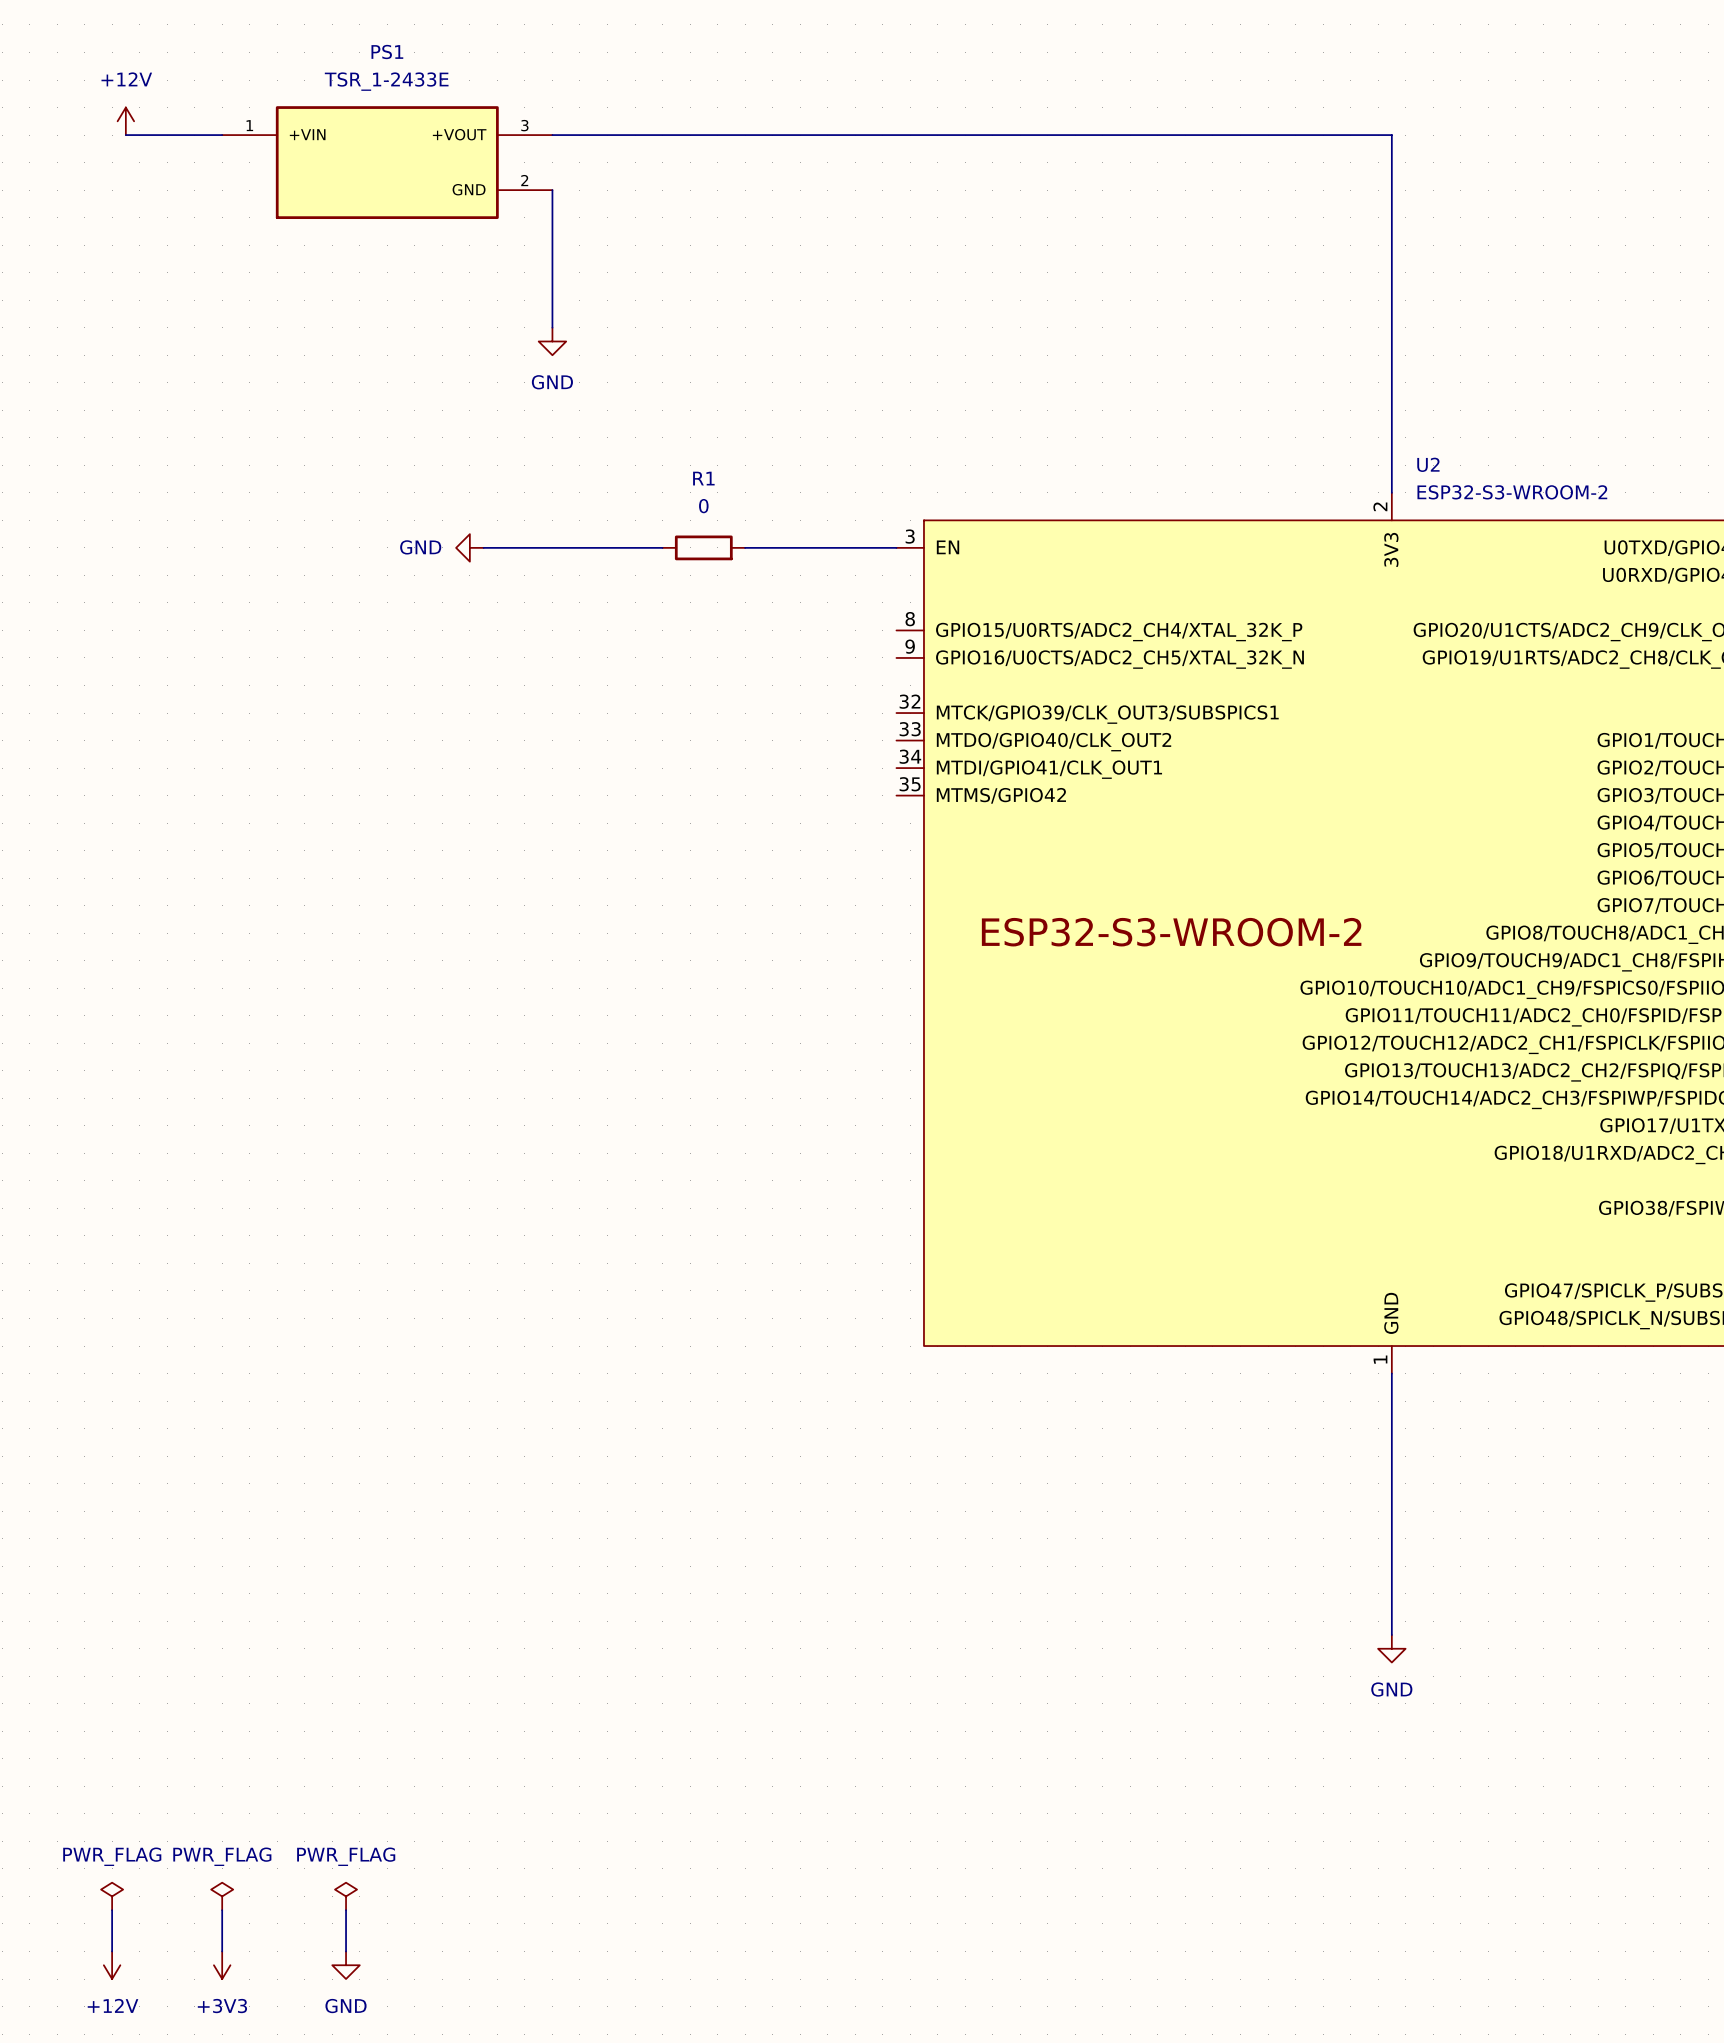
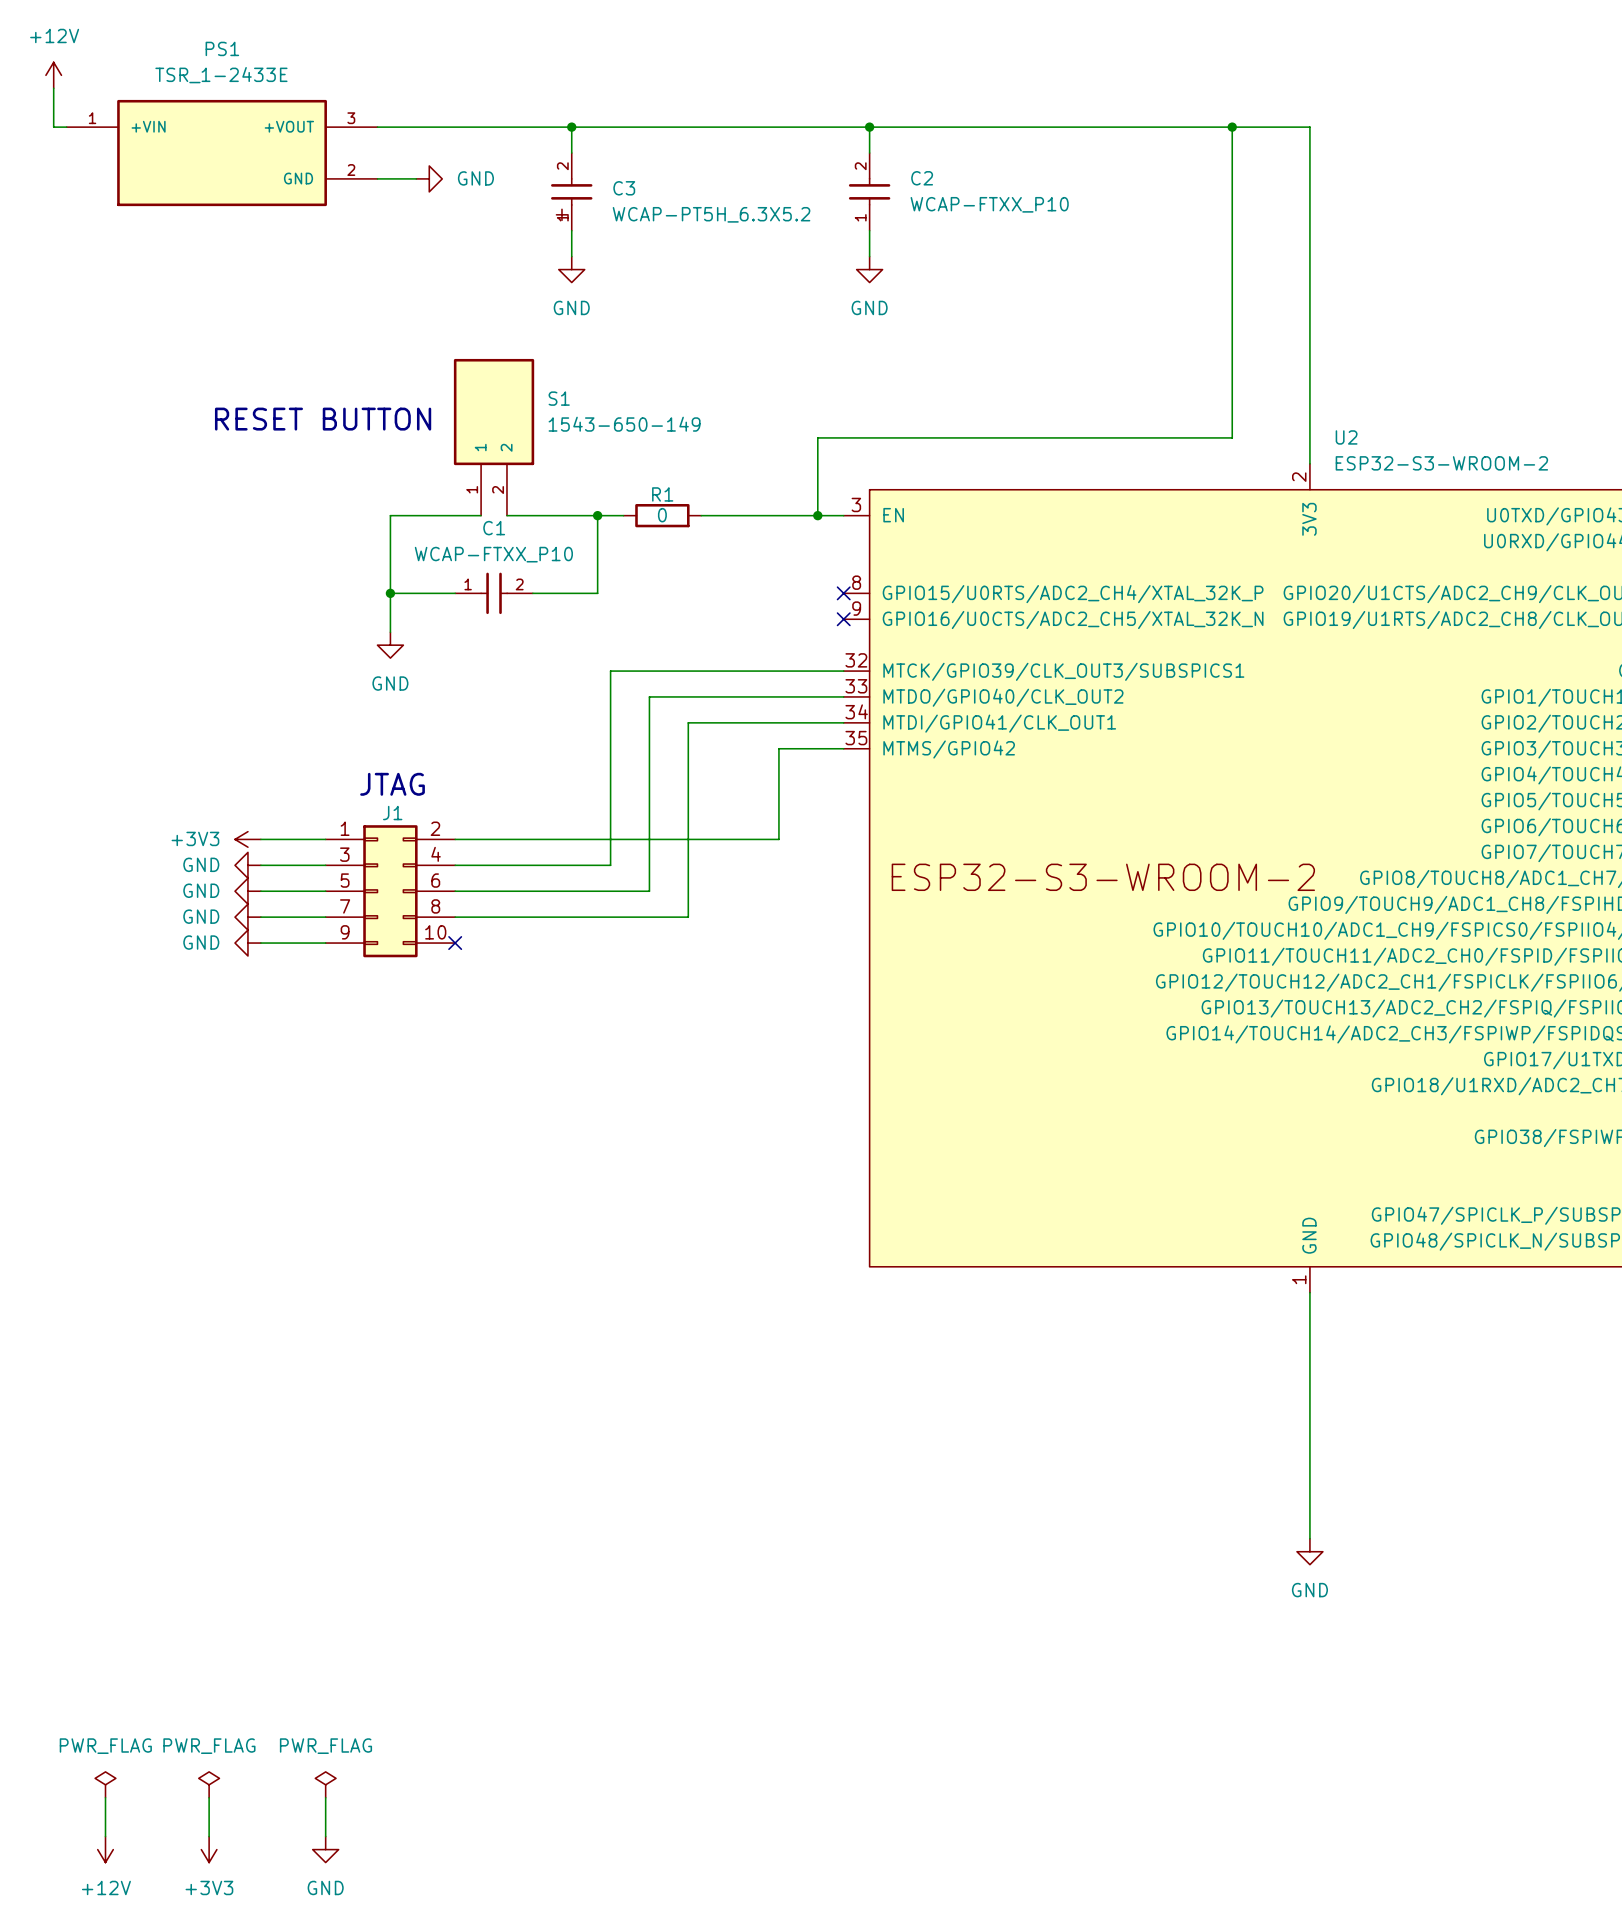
wire: none -> (53, 88) (53, 127) (66, 127)
power symbol position: +12V (125, 121) -> +12V (53, 75)
wire: none -> (571, 127) (571, 153)
junction: none -> (571, 127)
wire: none -> (869, 127) (869, 153)
junction: none -> (869, 127)
wire: none -> (1232, 127) (1232, 437) (817, 437) (817, 515)
junction: none -> (1232, 127)
PS1 position: (387, 162) -> (222, 153)
power symbol: none -> GND (429, 178)
wire: (552, 190) (552, 327) -> none
C3: none -> WCAP-PT5H_6.3X5.2 (571, 191)
C2: none -> WCAP-FTXX_P10 (869, 191)
wire: none -> (571, 230) (571, 256)
wire: none -> (869, 230) (869, 256)
power symbol: none -> GND (869, 269)
power symbol position: GND (552, 341) -> GND (571, 269)
text: none -> RESET BUTTON (323, 419)
S1: none -> 1543-650-149 (494, 437)
R1 name position: R1 (703, 478) -> R1 (662, 494)
R1 value position: 0 (703, 506) -> 0 (662, 515)
power symbol: GND (469, 547) -> none
wire: none -> (455, 515) (390, 515) (390, 632)
wire: (511, 547) (538, 547) -> none
wire: none -> (597, 515) (597, 593) (532, 593)
junction: none -> (597, 515)
junction: none -> (817, 515)
wire: none -> (390, 593) (455, 593)
junction: none -> (390, 593)
C1: none -> WCAP-FTXX_P10 (494, 593)
no-connect mark: none -> (843, 593)
no-connect mark: none -> (843, 619)
power symbol: none -> GND (390, 645)
wire: none -> (843, 671) (610, 671) (610, 865) (455, 865)
wire: none -> (843, 696) (649, 696) (649, 891) (455, 891)
wire: none -> (843, 722) (688, 722) (688, 917) (455, 917)
wire: none -> (843, 748) (778, 748) (778, 839) (455, 839)
text: none -> JTAG (392, 784)
power symbol: none -> +3V3 (247, 839)
wire: none -> (260, 839) (325, 839)
power symbol: none -> GND (247, 865)
wire: none -> (260, 865) (325, 865)
power symbol: none -> GND (247, 891)
wire: none -> (260, 891) (325, 891)
J1: none -> (390, 891)
power symbol: none -> GND (247, 917)
wire: none -> (260, 917) (325, 917)
power symbol: none -> GND (247, 943)
wire: none -> (260, 943) (325, 943)
no-connect mark: none -> (455, 943)

